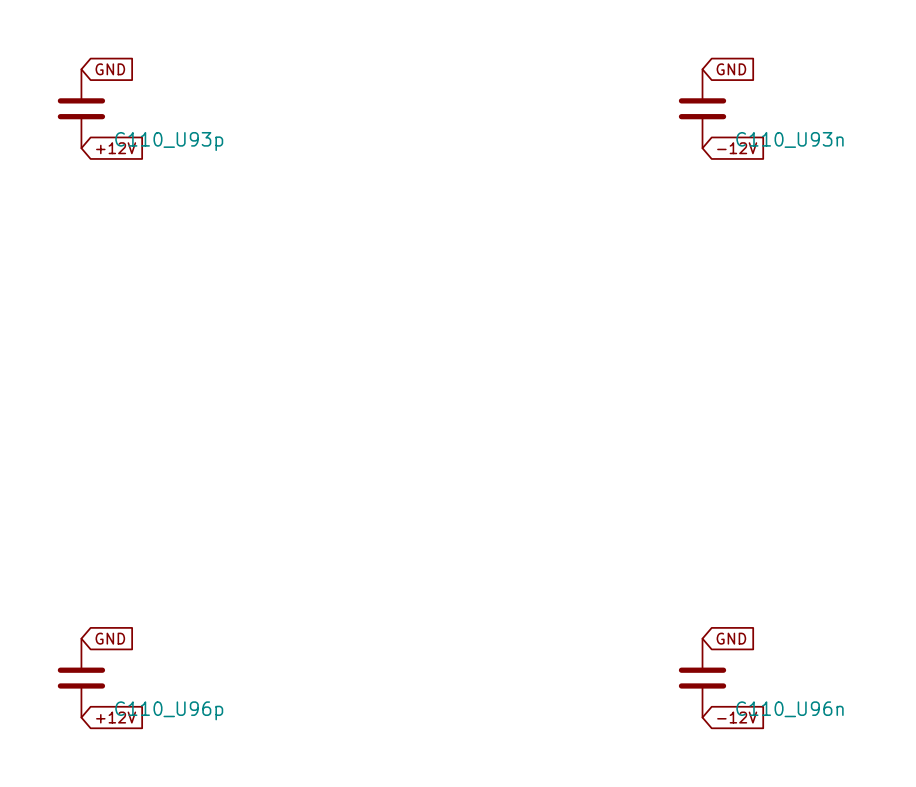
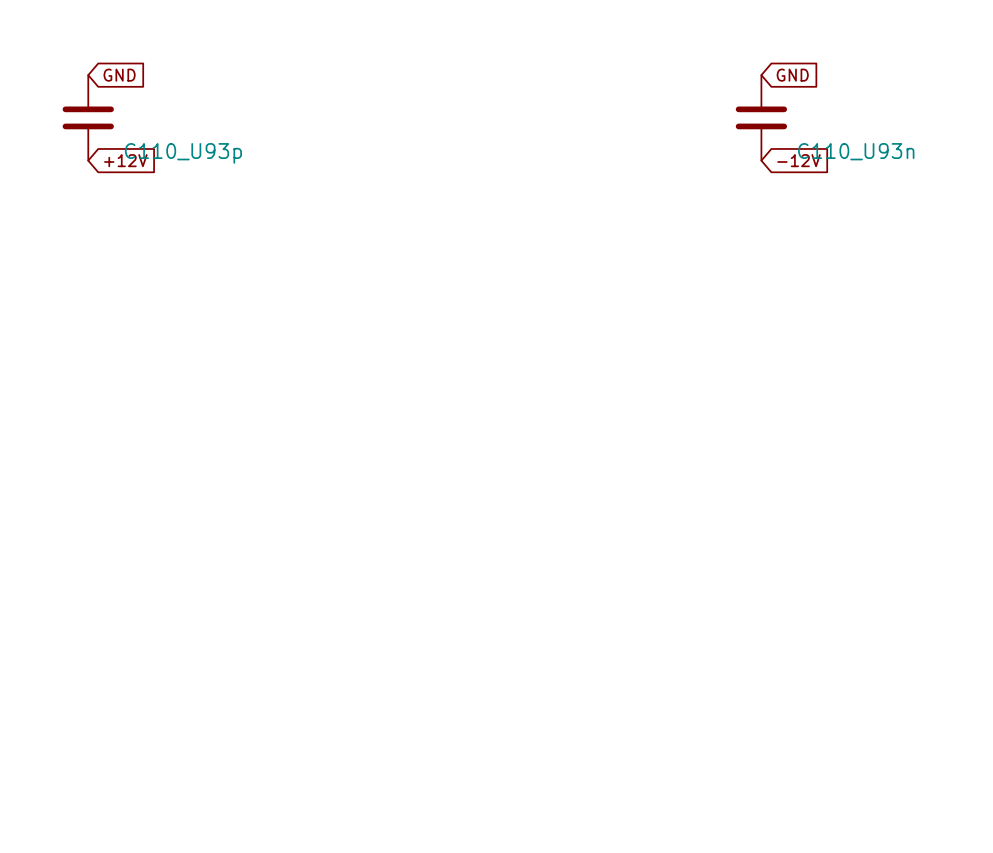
global label: GND (110, 638) -> none
global label: GND (731, 638) -> none
C110_U96p: (81, 678) -> none
C110_U96n: (702, 678) -> none
global label: +12V (116, 717) -> none
global label: -12V (737, 717) -> none

